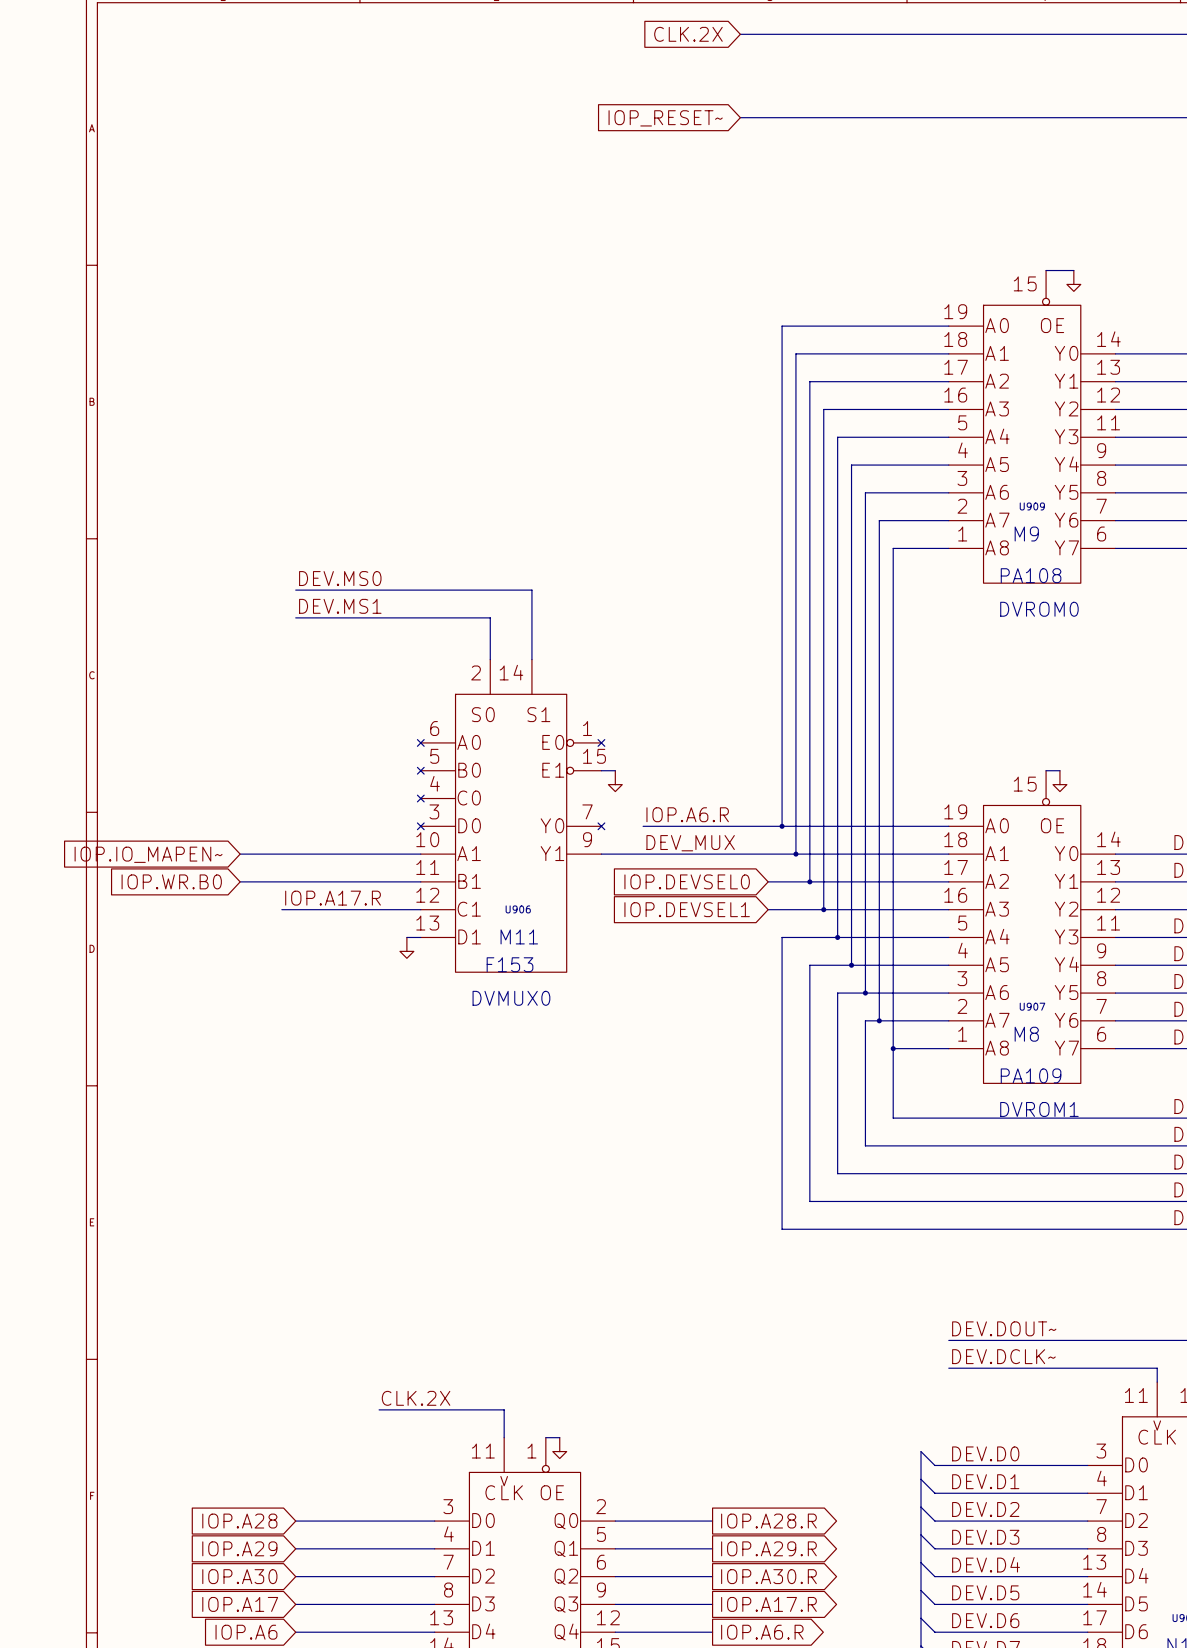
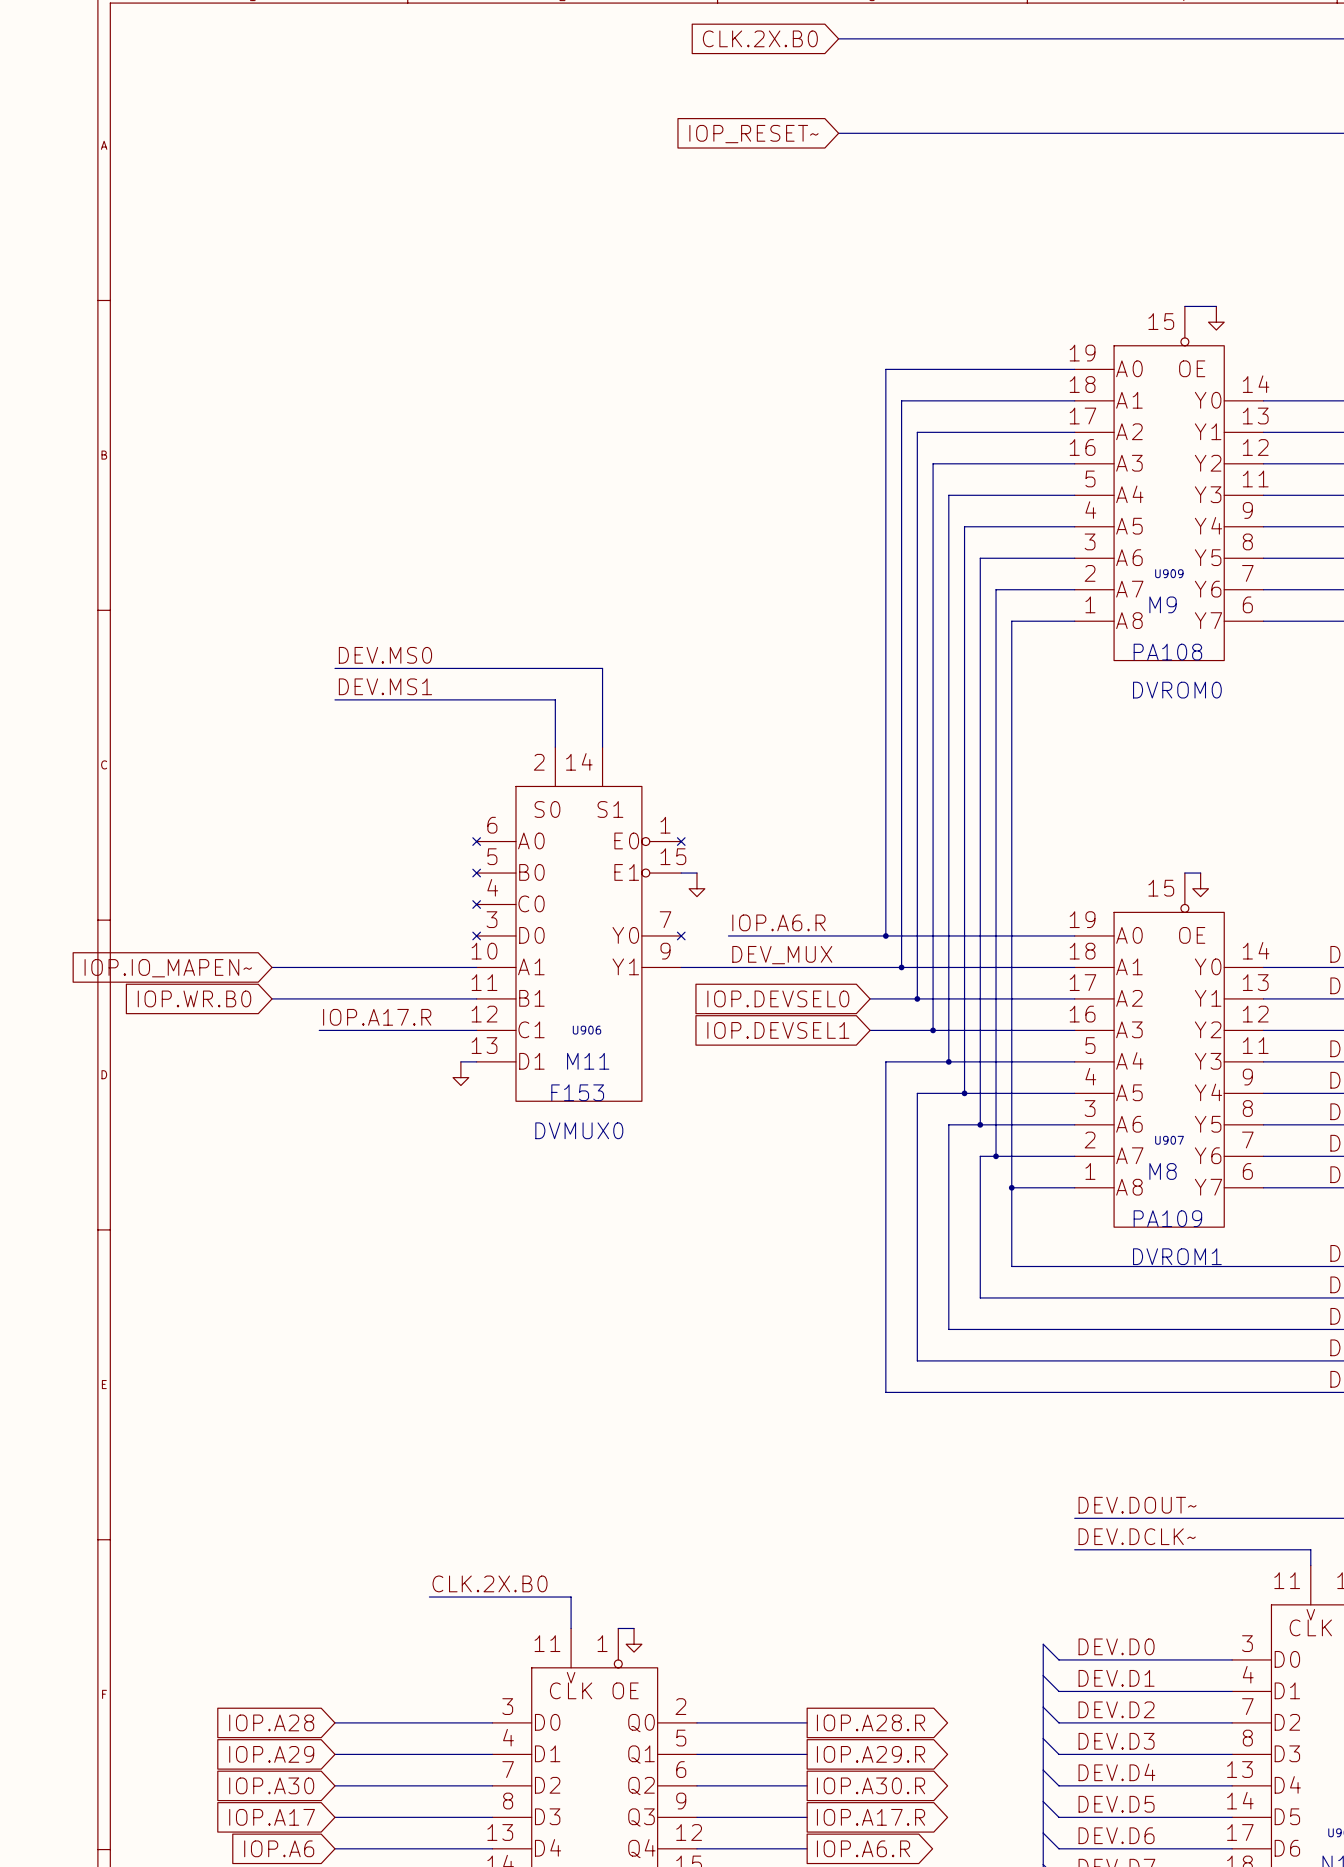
global label: CLK.2X (688, 34) -> CLK.2X.B0 (760, 38)
label: CLK.2X (416, 1398) -> CLK.2X.B0 (490, 1583)

